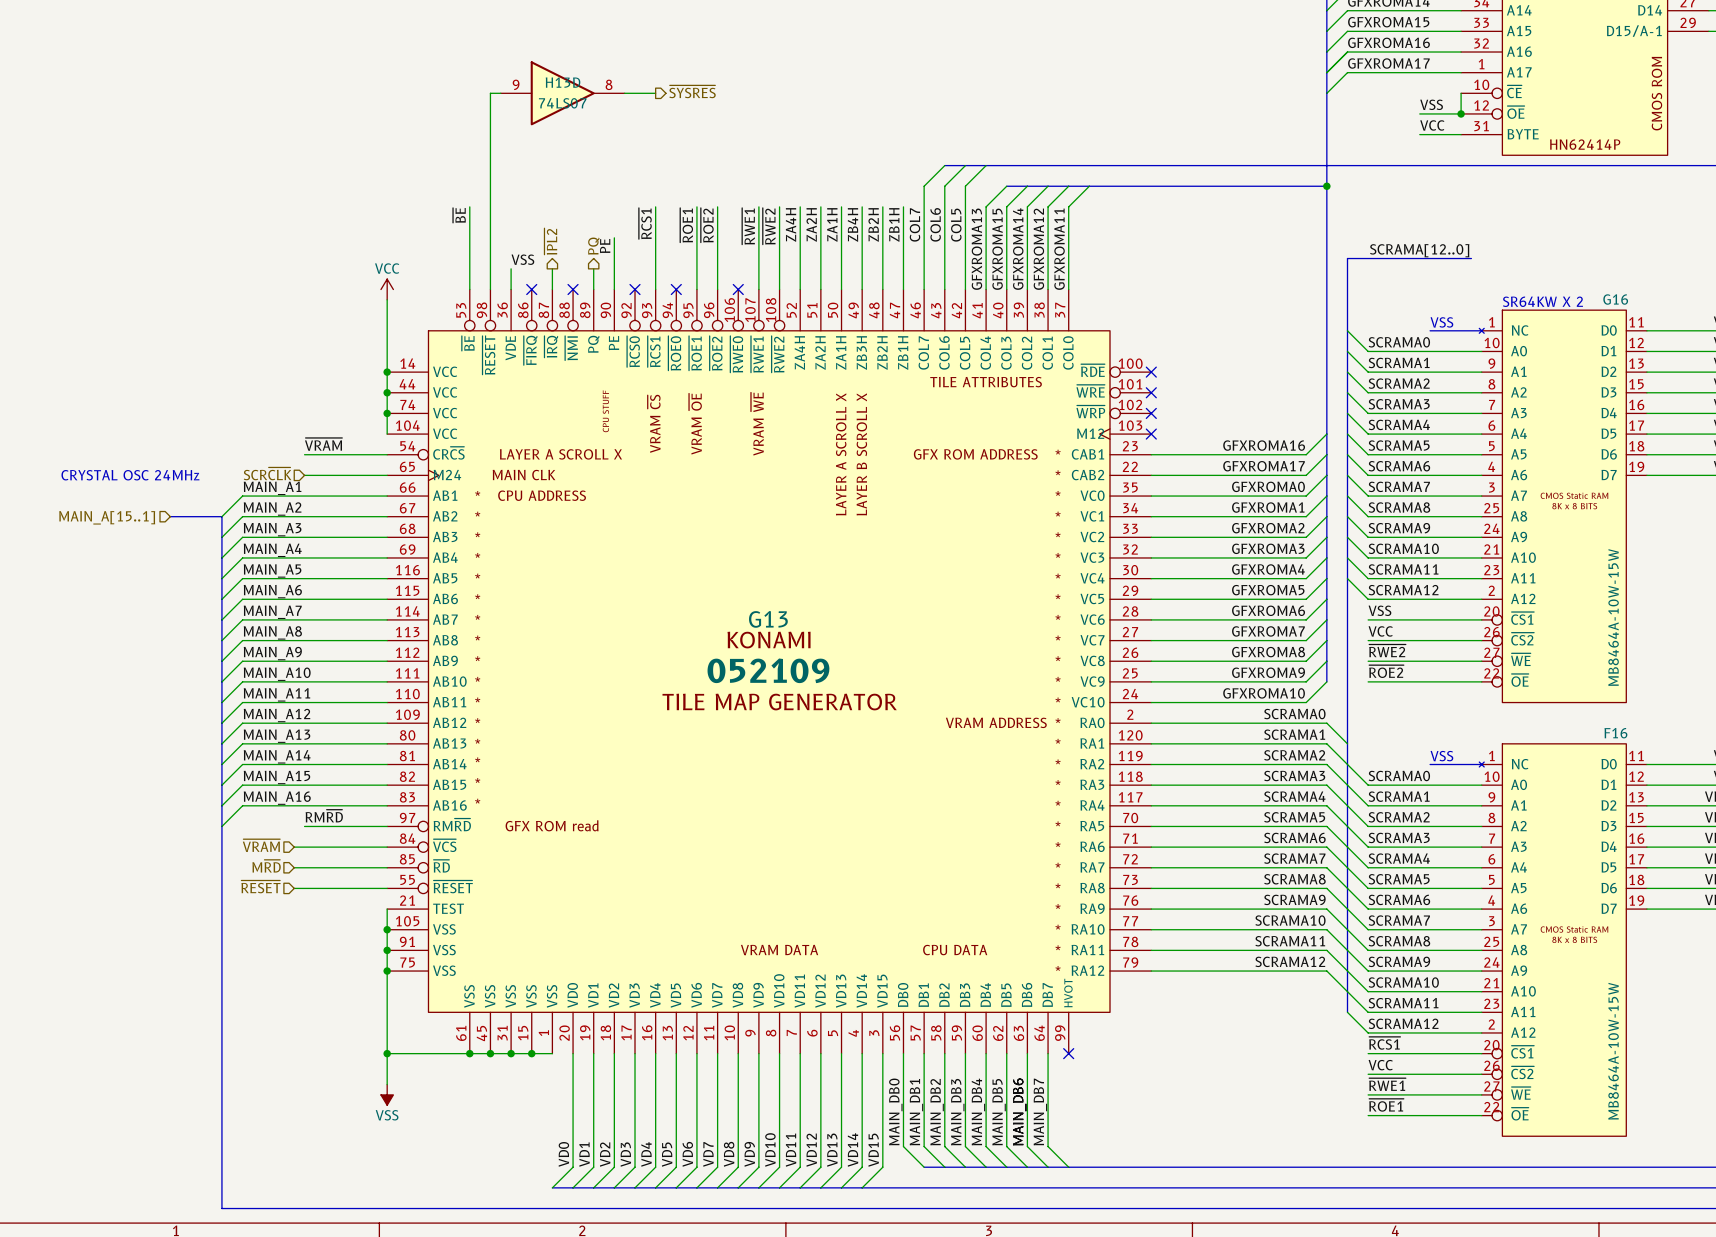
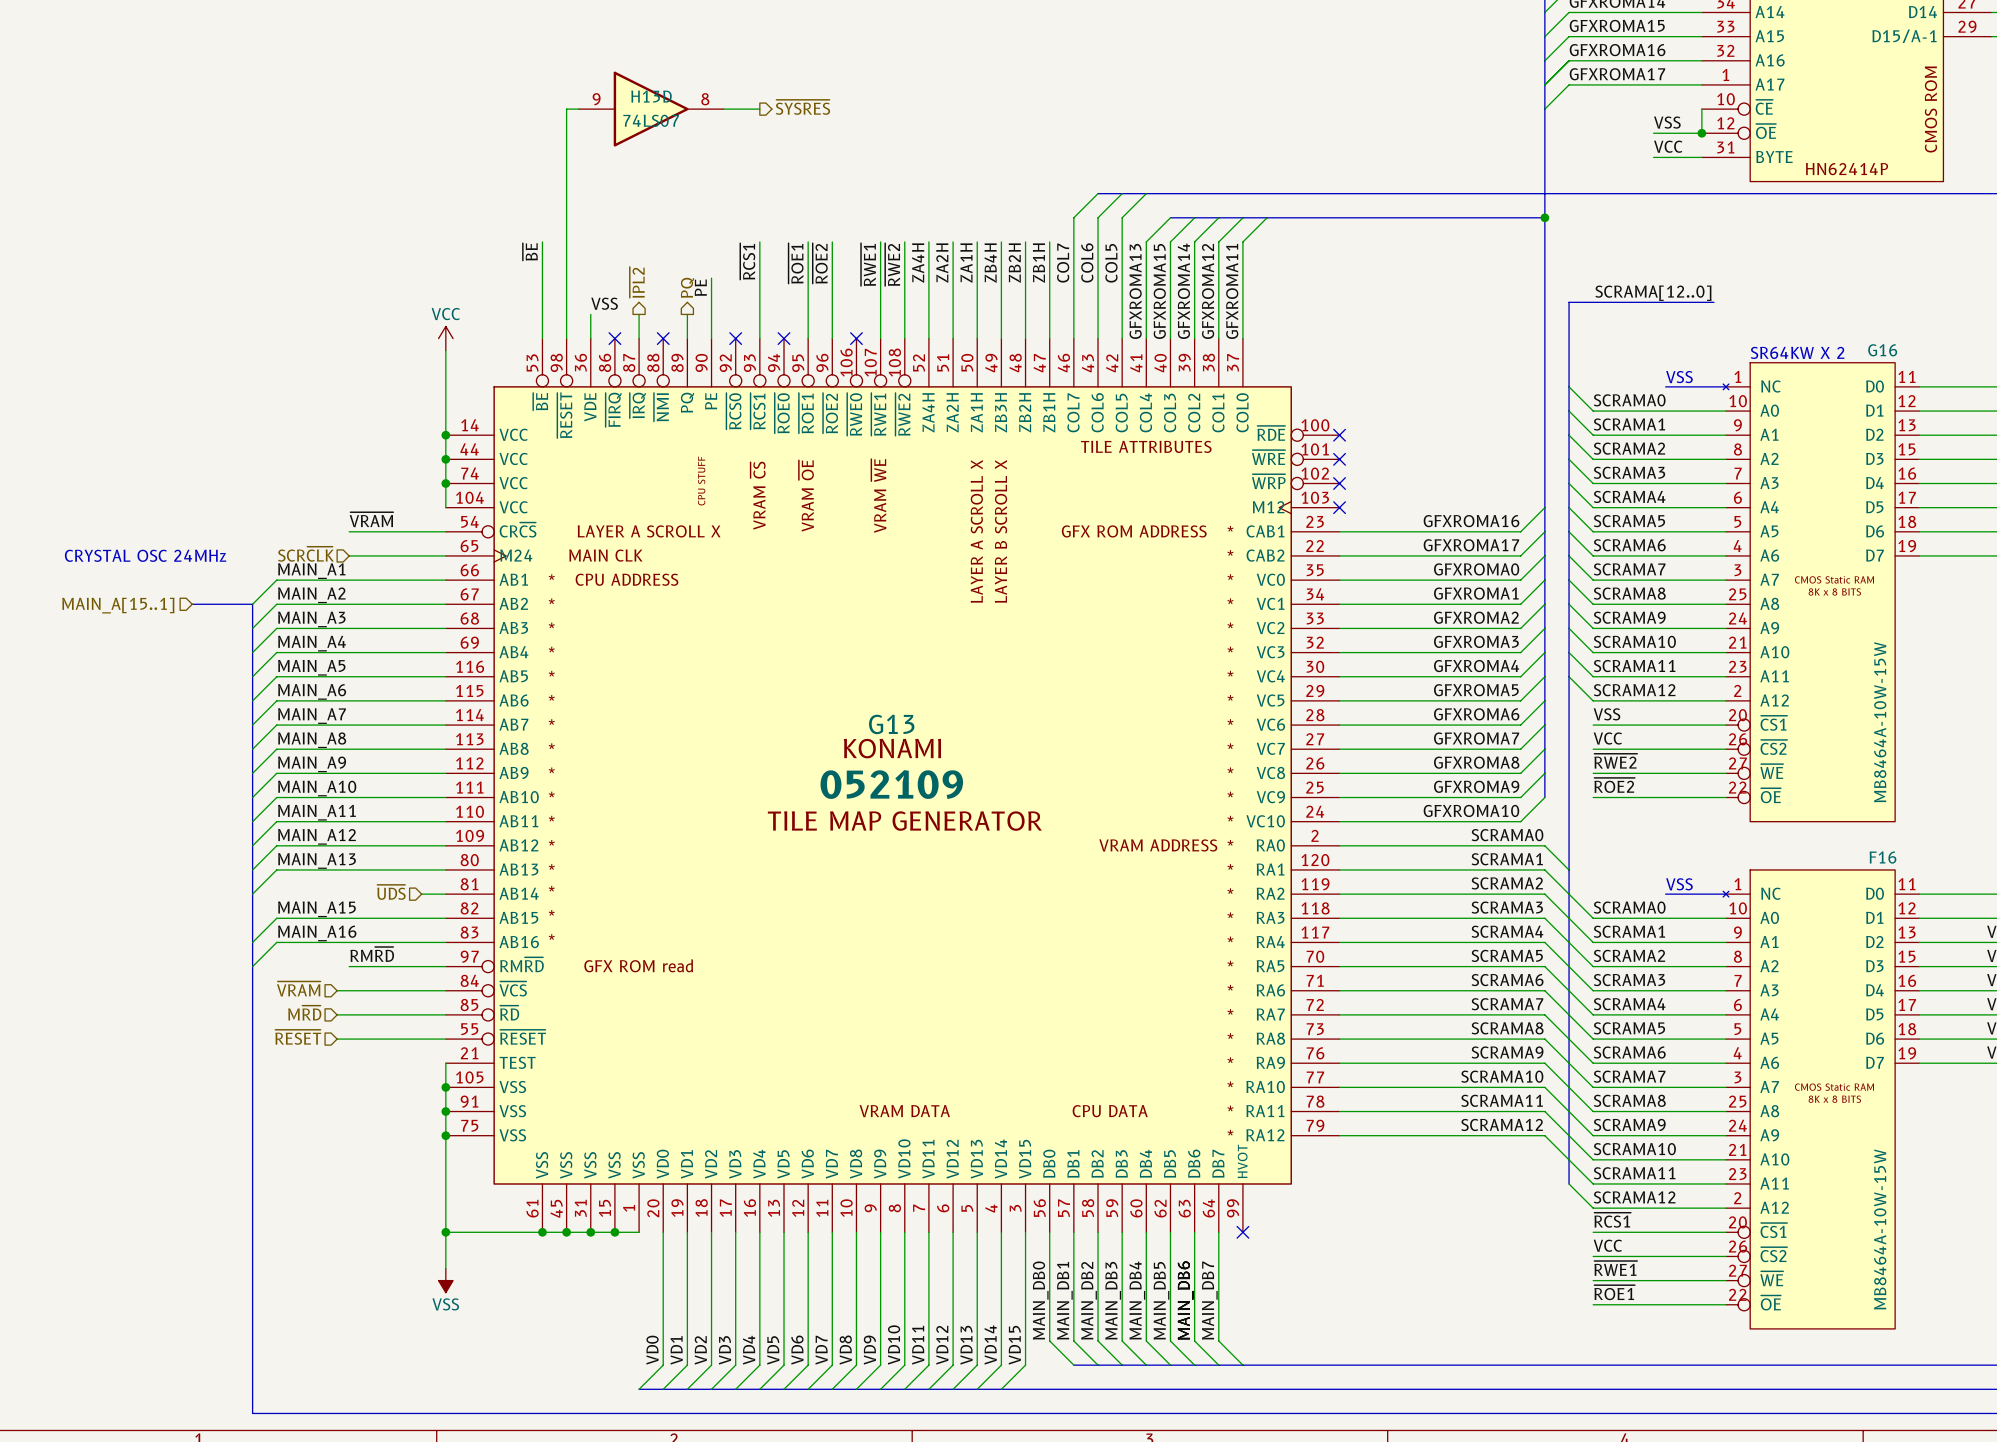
label: MAIN_A14 (277, 756) -> none
hierarchical label: none -> ~{UDS} (391, 892)
wire: (366, 764) (242, 764) (221, 785) -> none

